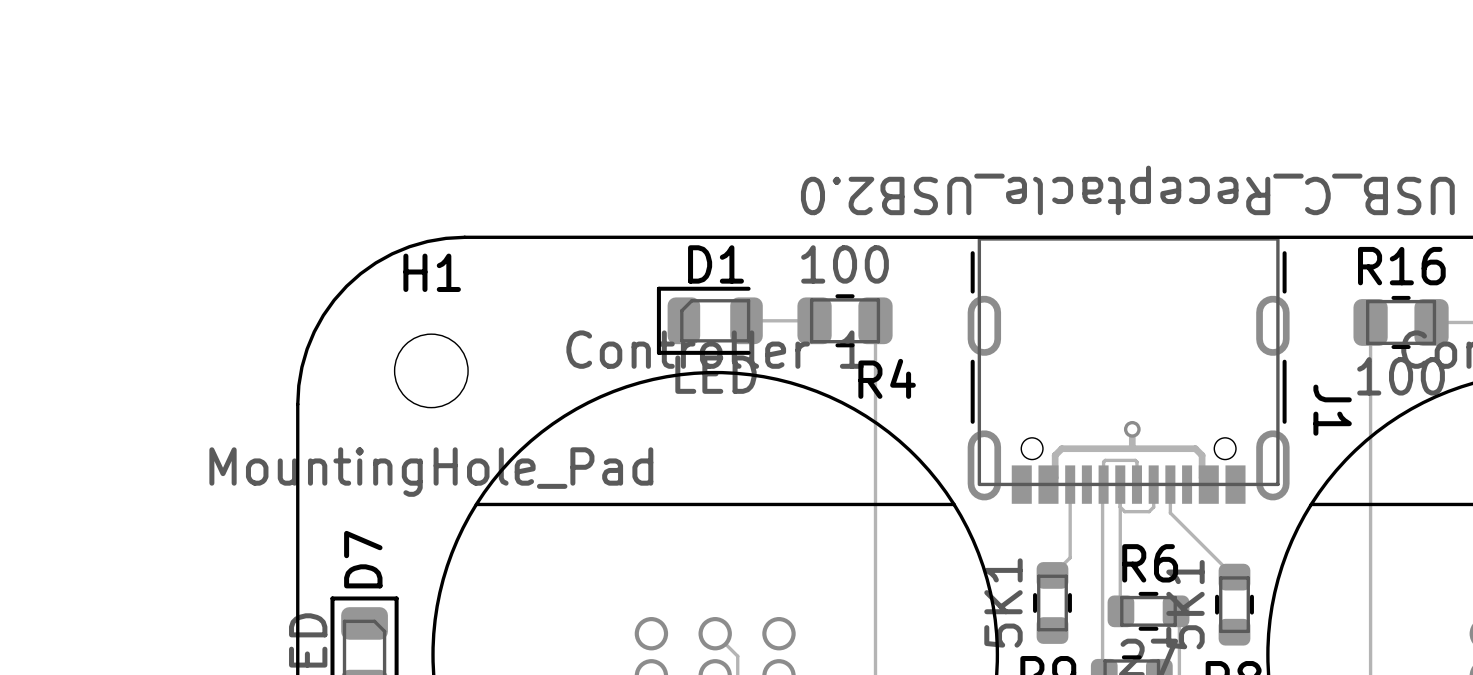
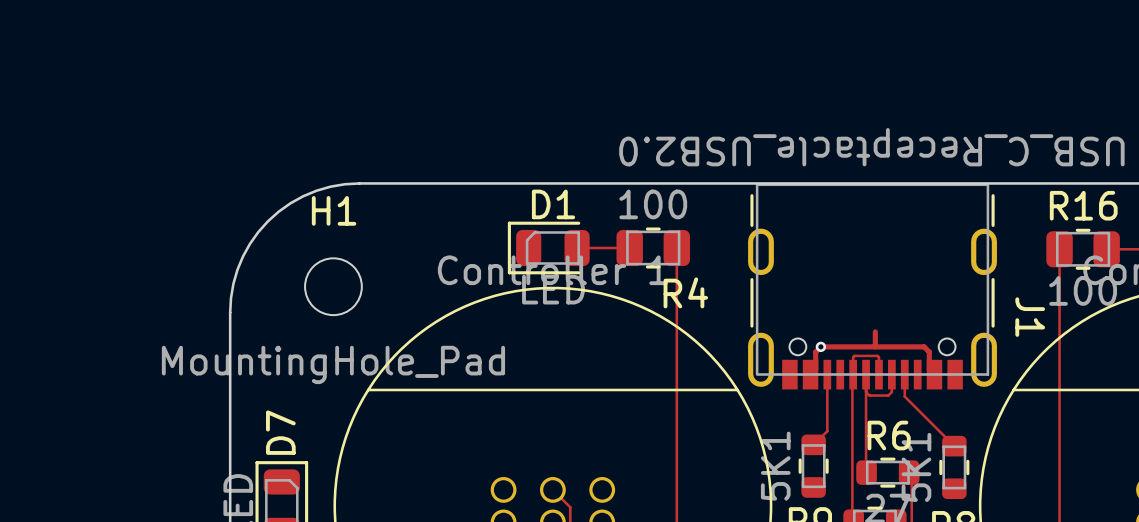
via: (1132, 429) -> none
via: none -> (820, 346)

